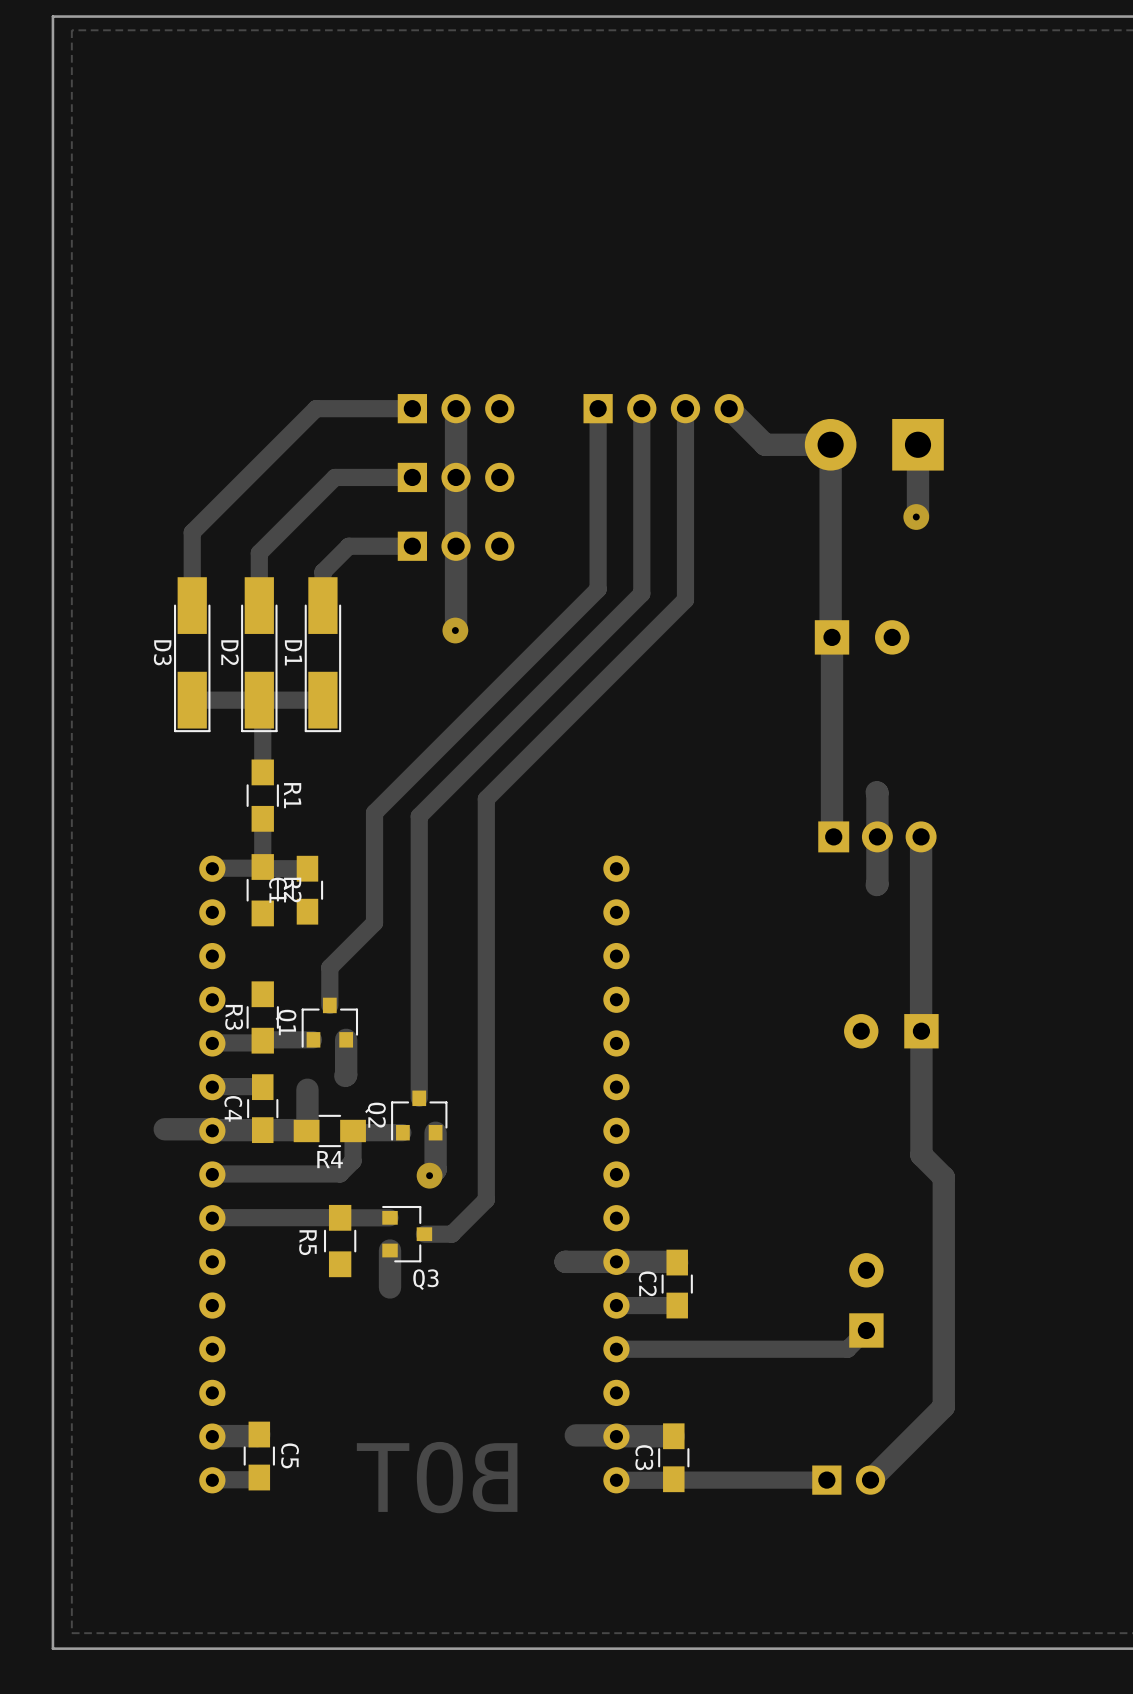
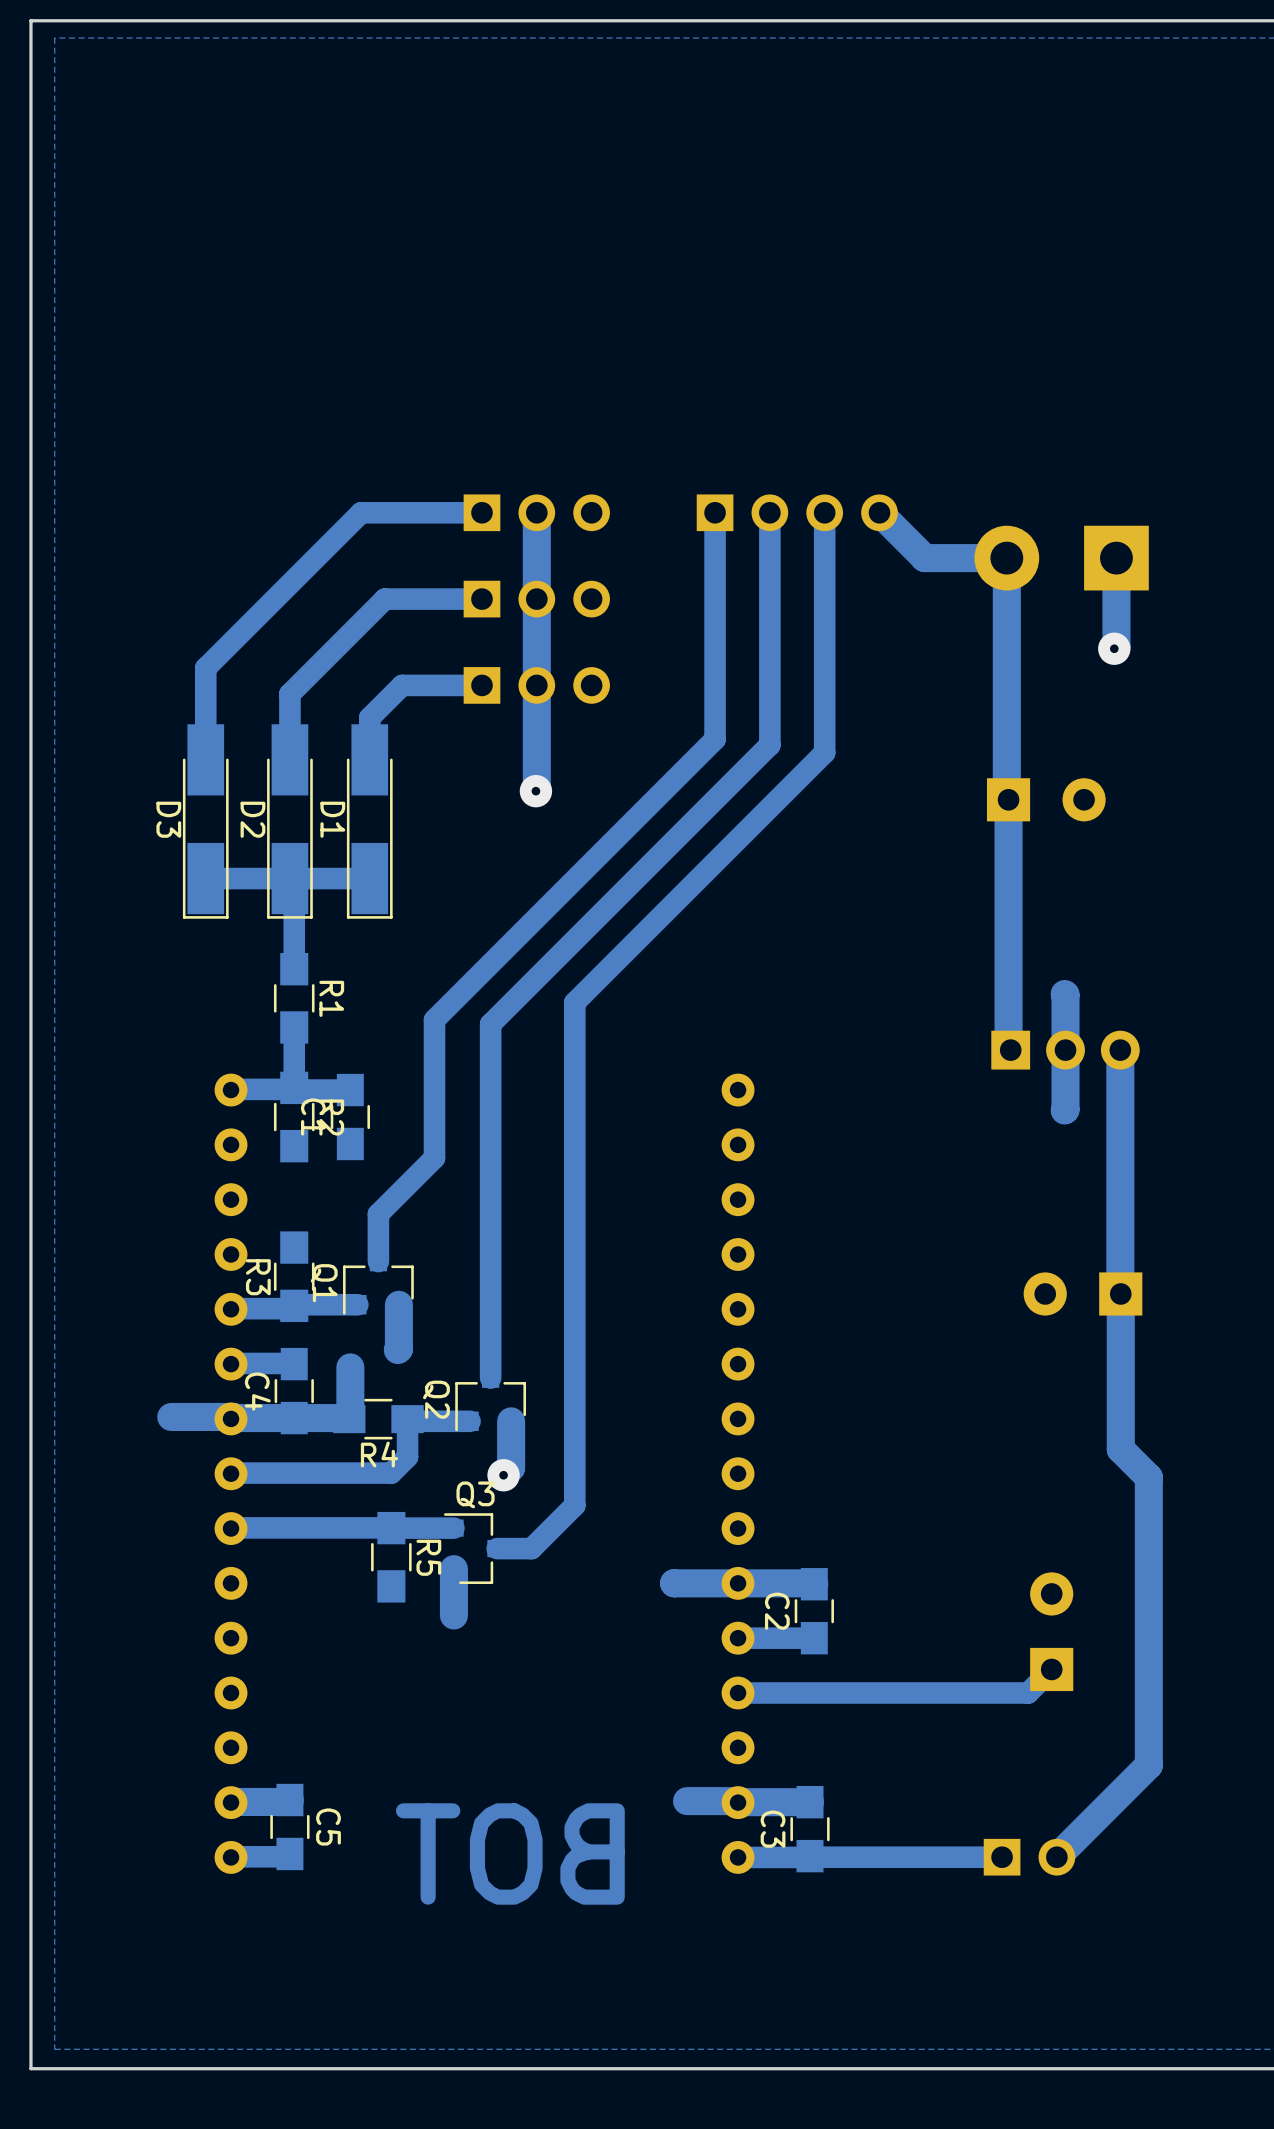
R5 name position: R5 (307, 1242) -> R5 (428, 1557)
Q3 name position: Q3 (425, 1279) -> Q3 (475, 1494)

